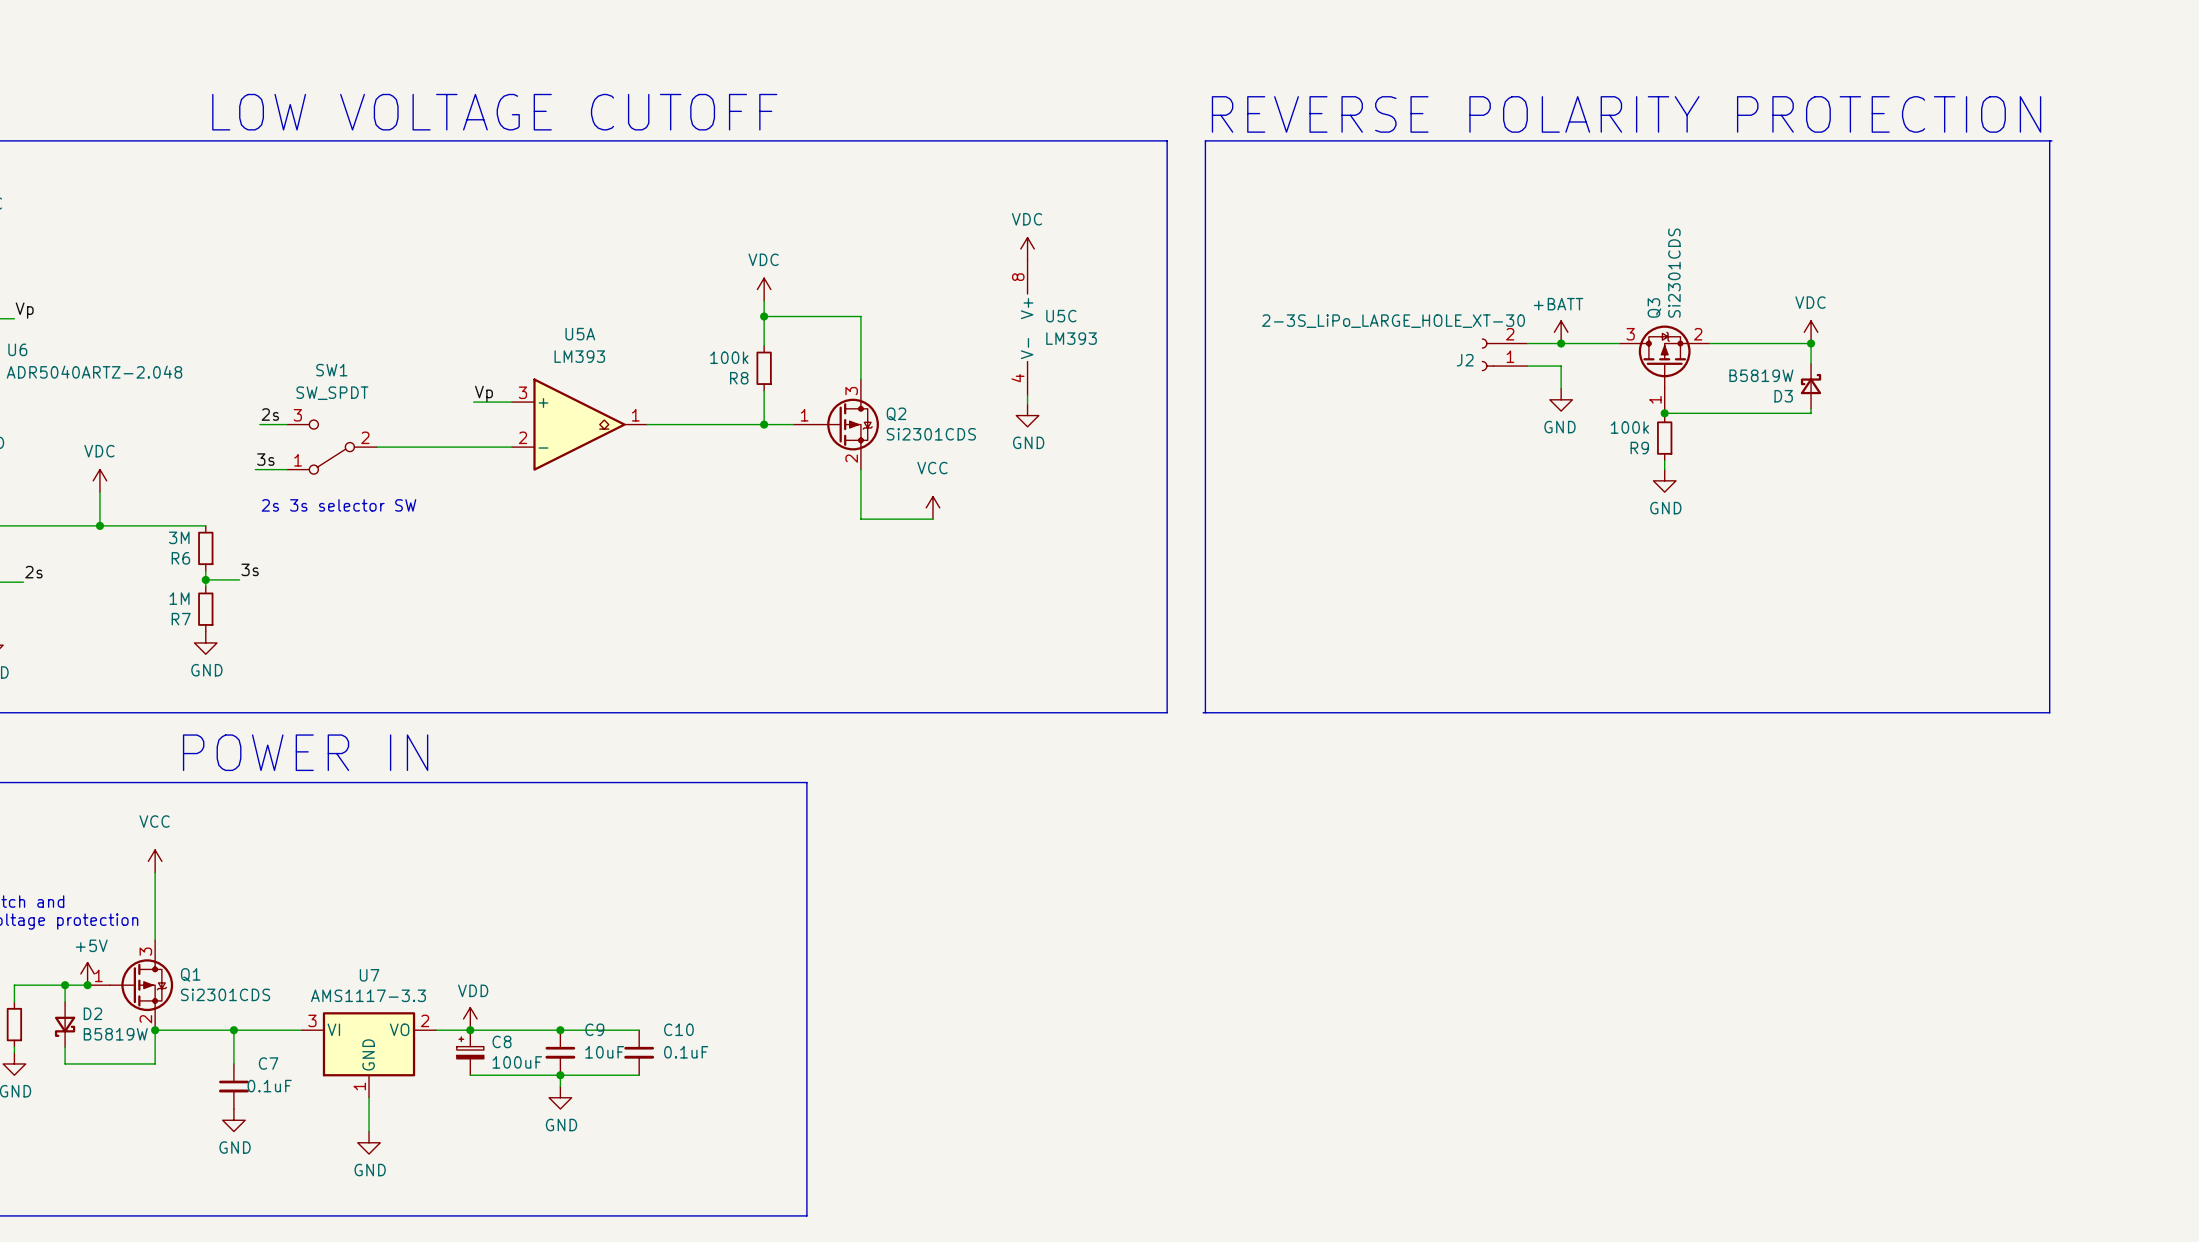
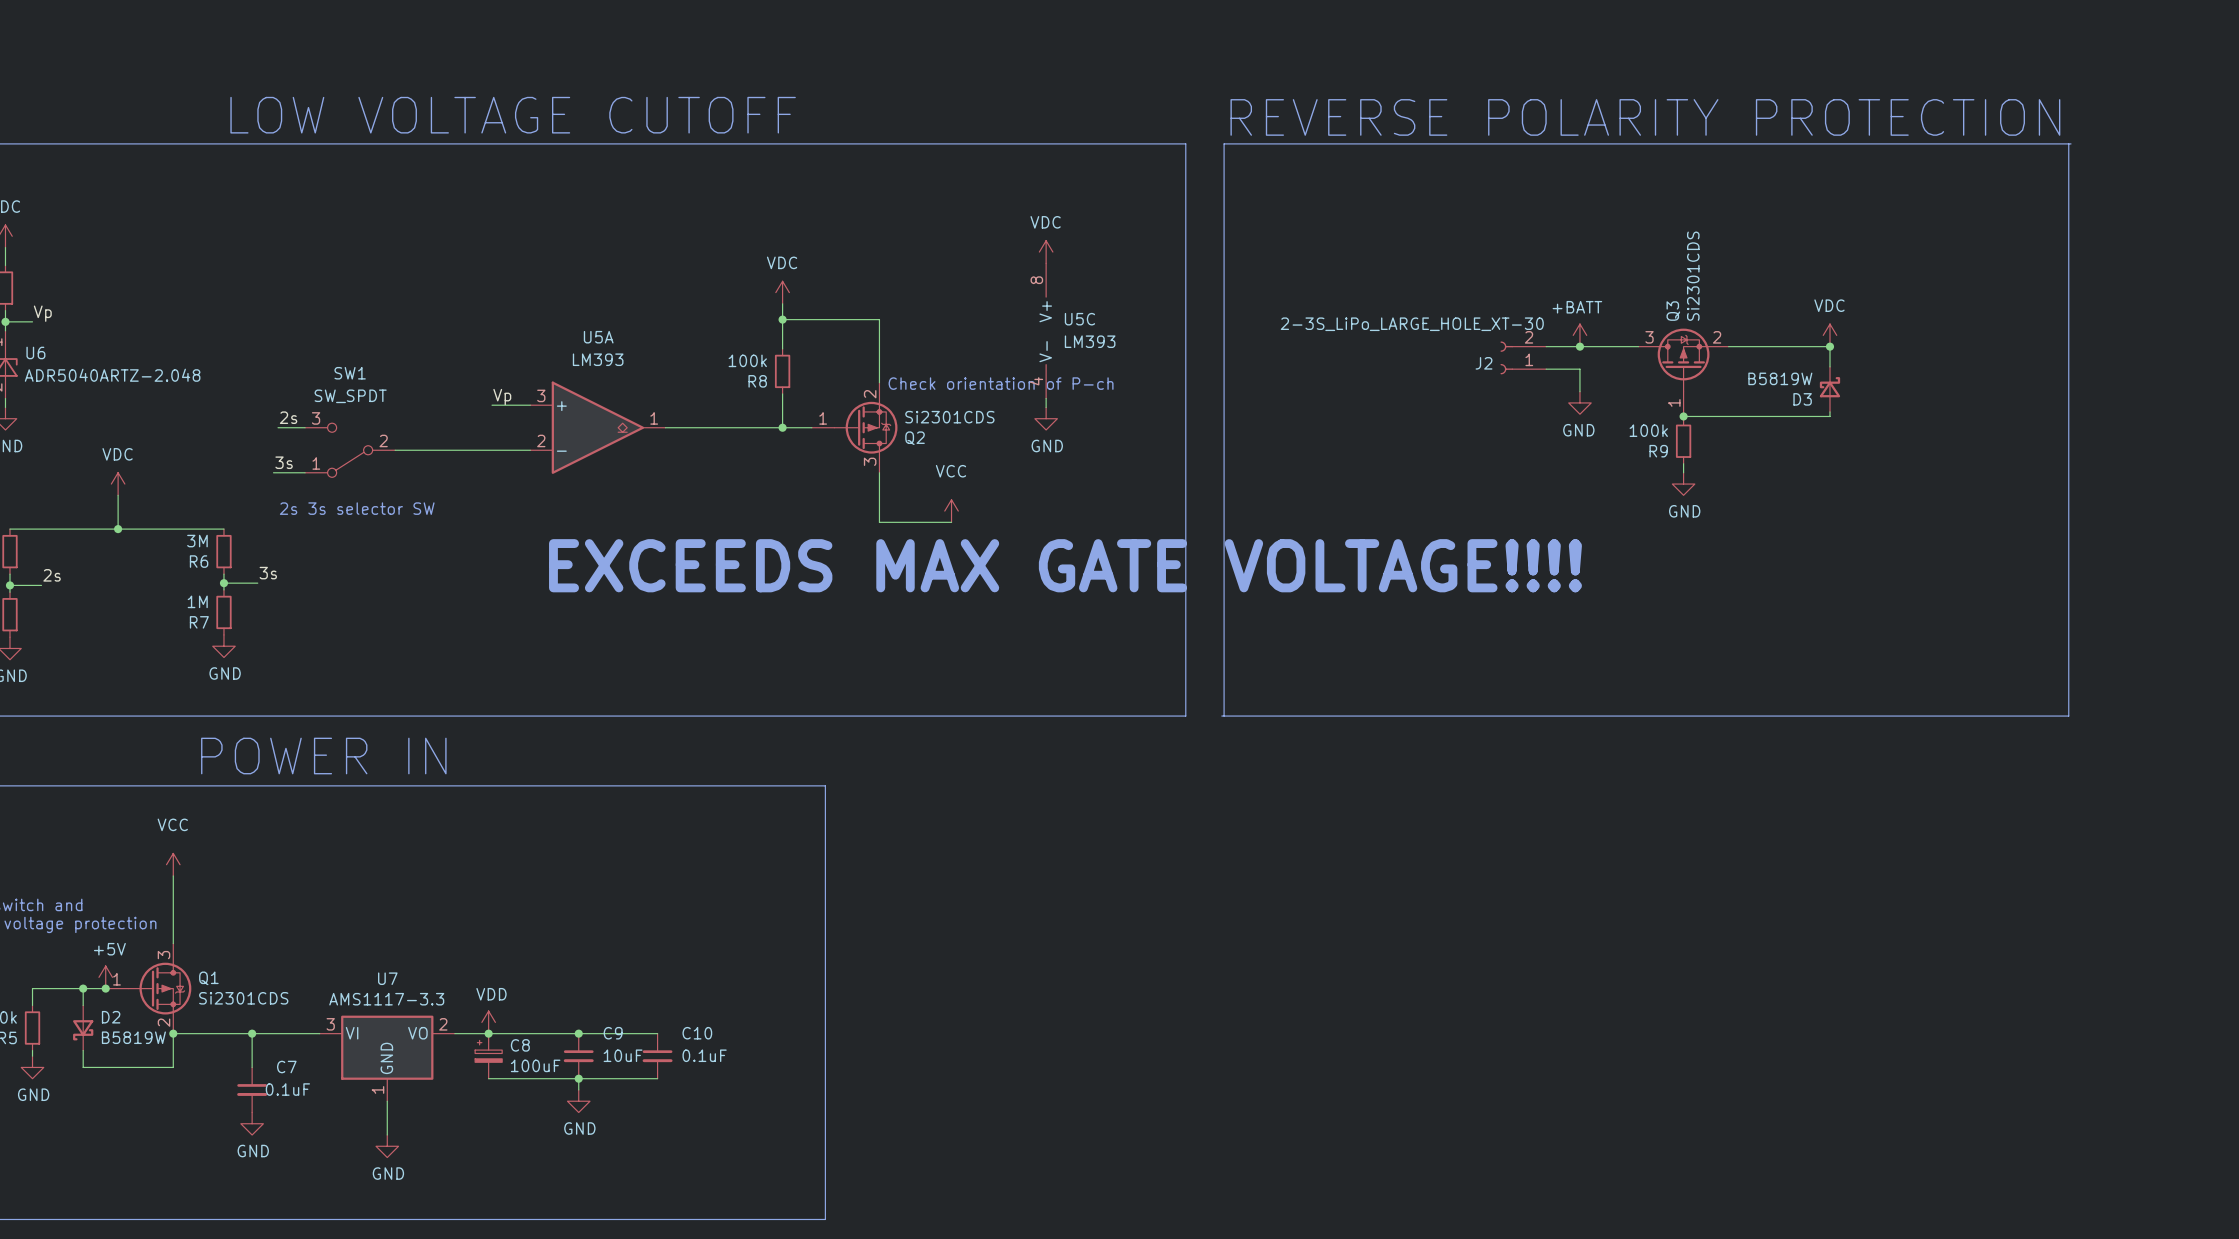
text: none -> Check orientation of P-ch (1001, 383)
Q2 flip: as is (847, 424) -> up-down (865, 427)
text: none -> EXCEEDS MAX GATE VOLTAGE!!!! (1065, 565)

